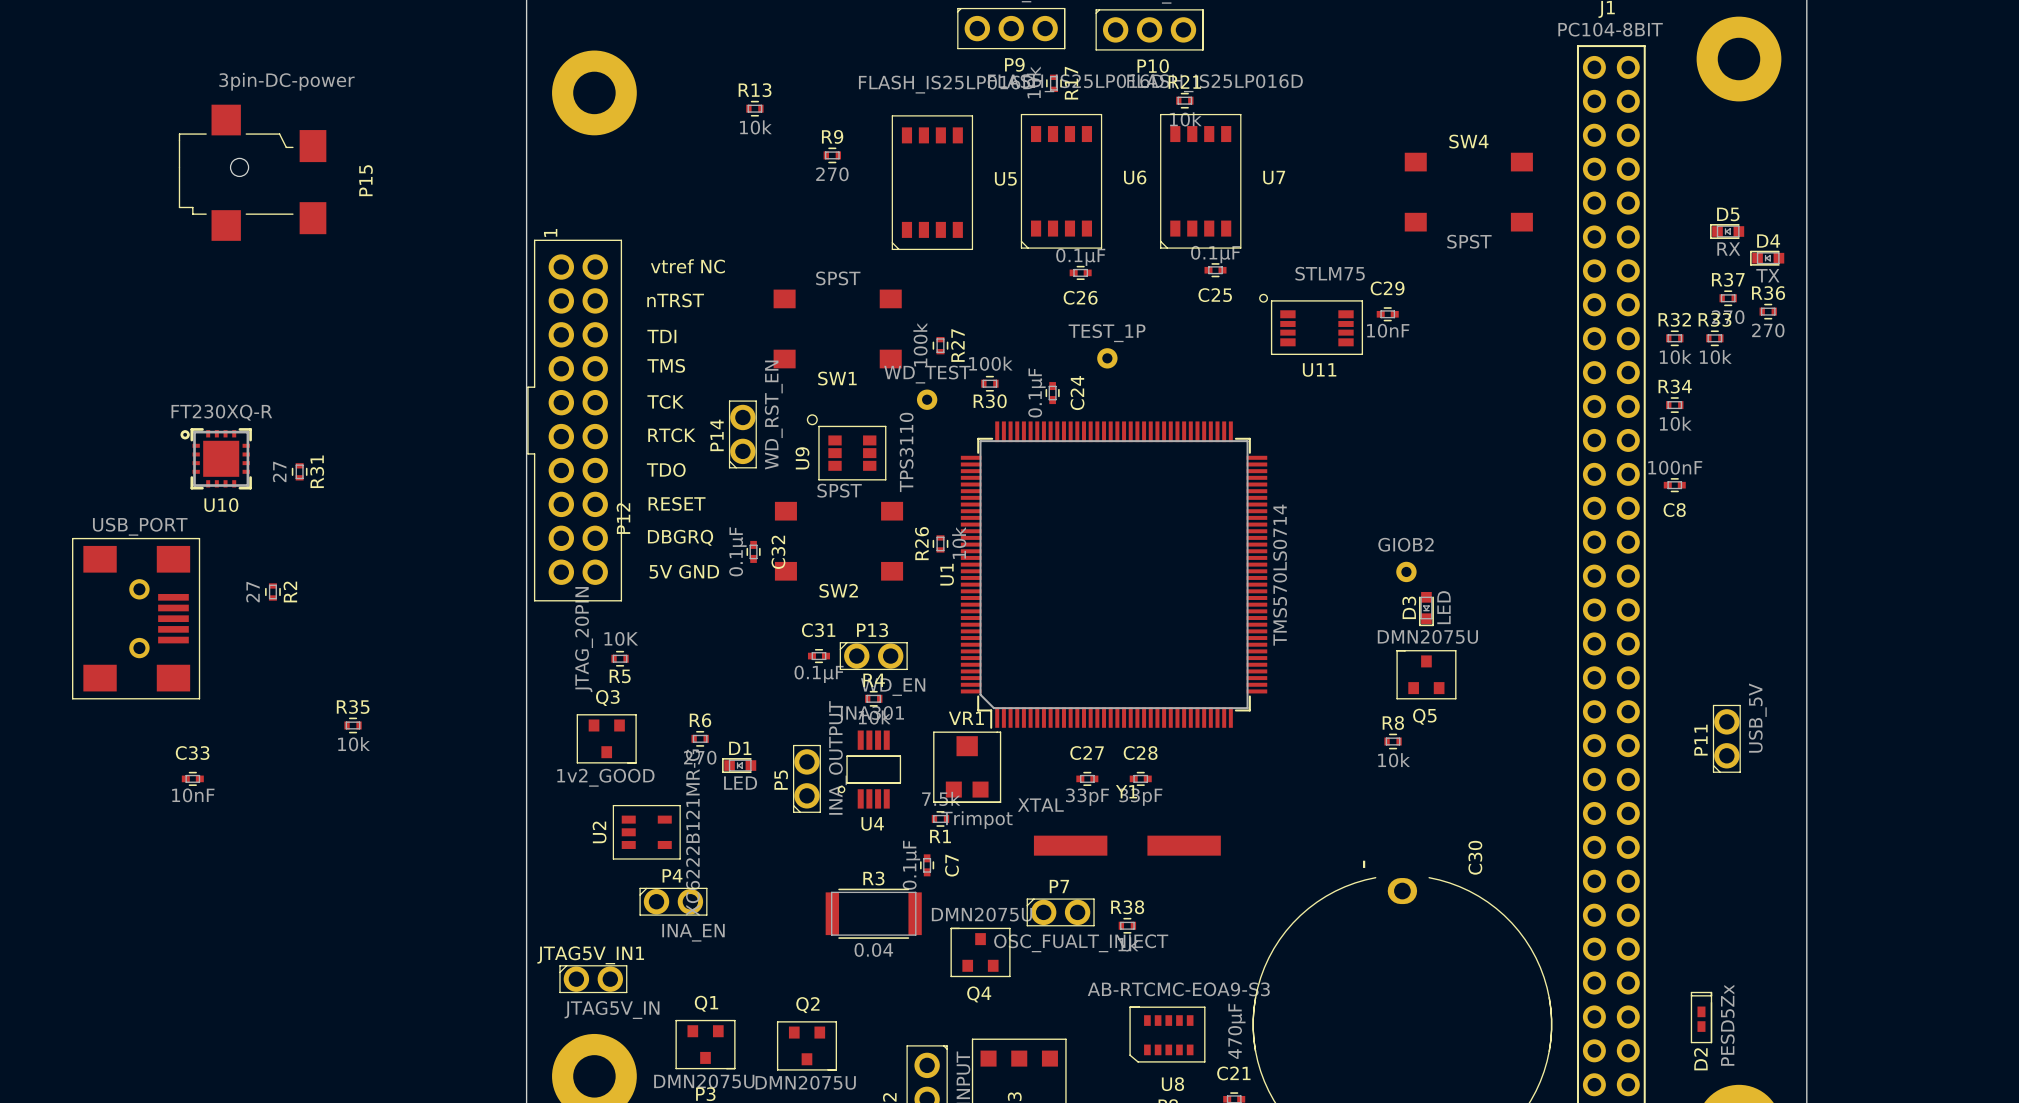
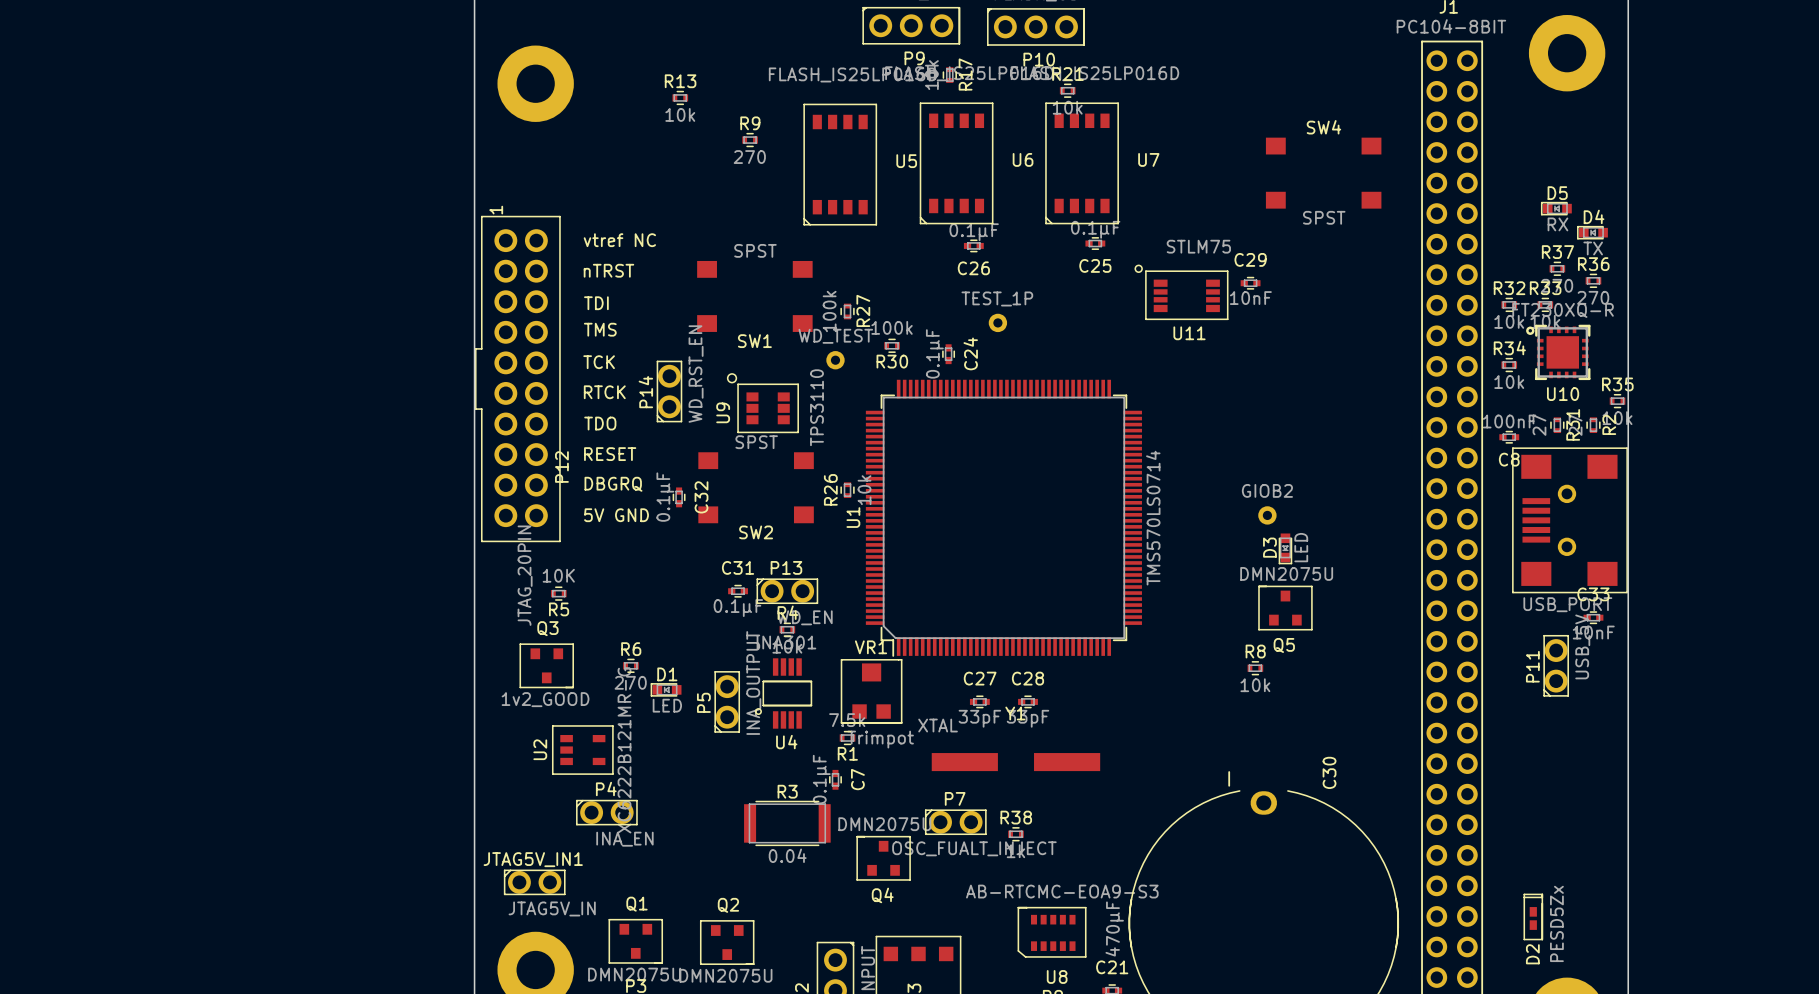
P15: 3pin-DC-power (252, 172) -> none
U10 position: (216, 458) -> (1558, 352)
R31 position: (299, 471) -> (1557, 425)
part: none -> USB_PORT (1570, 520)
R2 position: (272, 591) -> (1593, 425)
part: USB_PORT (136, 618) -> none
R35 position: (353, 725) -> (1617, 401)
C33 position: (192, 778) -> (1593, 617)

